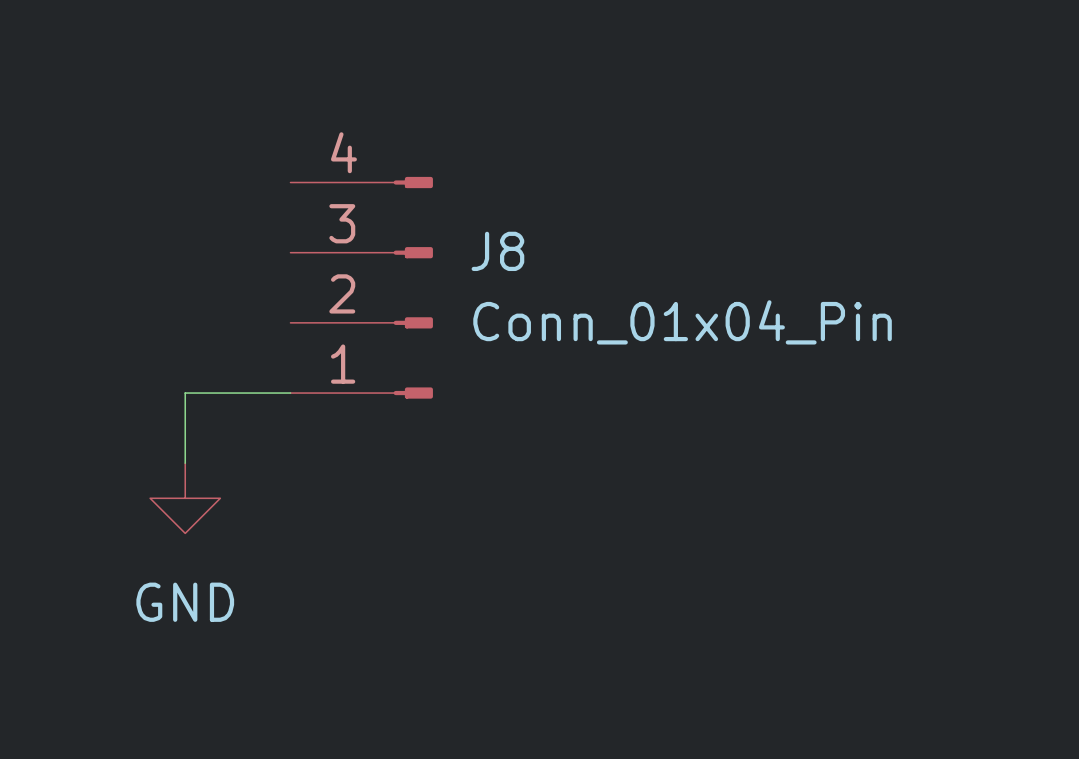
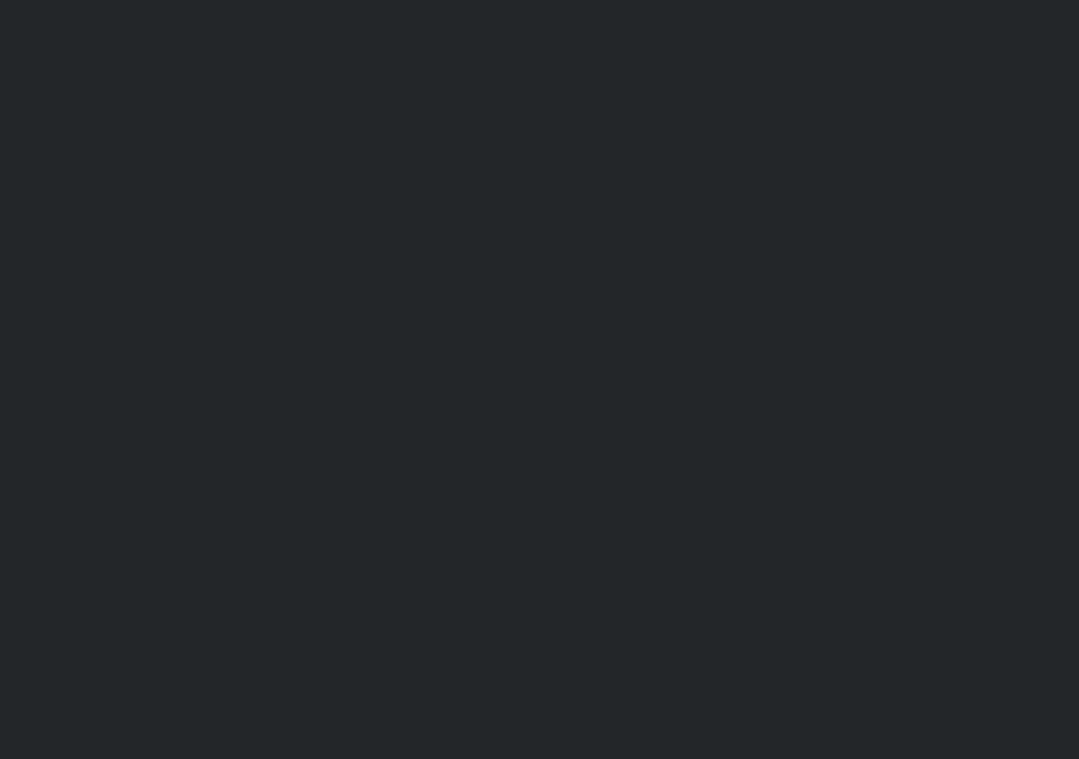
J8: Conn_01x04_Pin (361, 287) -> none
wire: (290, 393) (185, 393) (185, 463) -> none
power symbol: GND (185, 498) -> none

